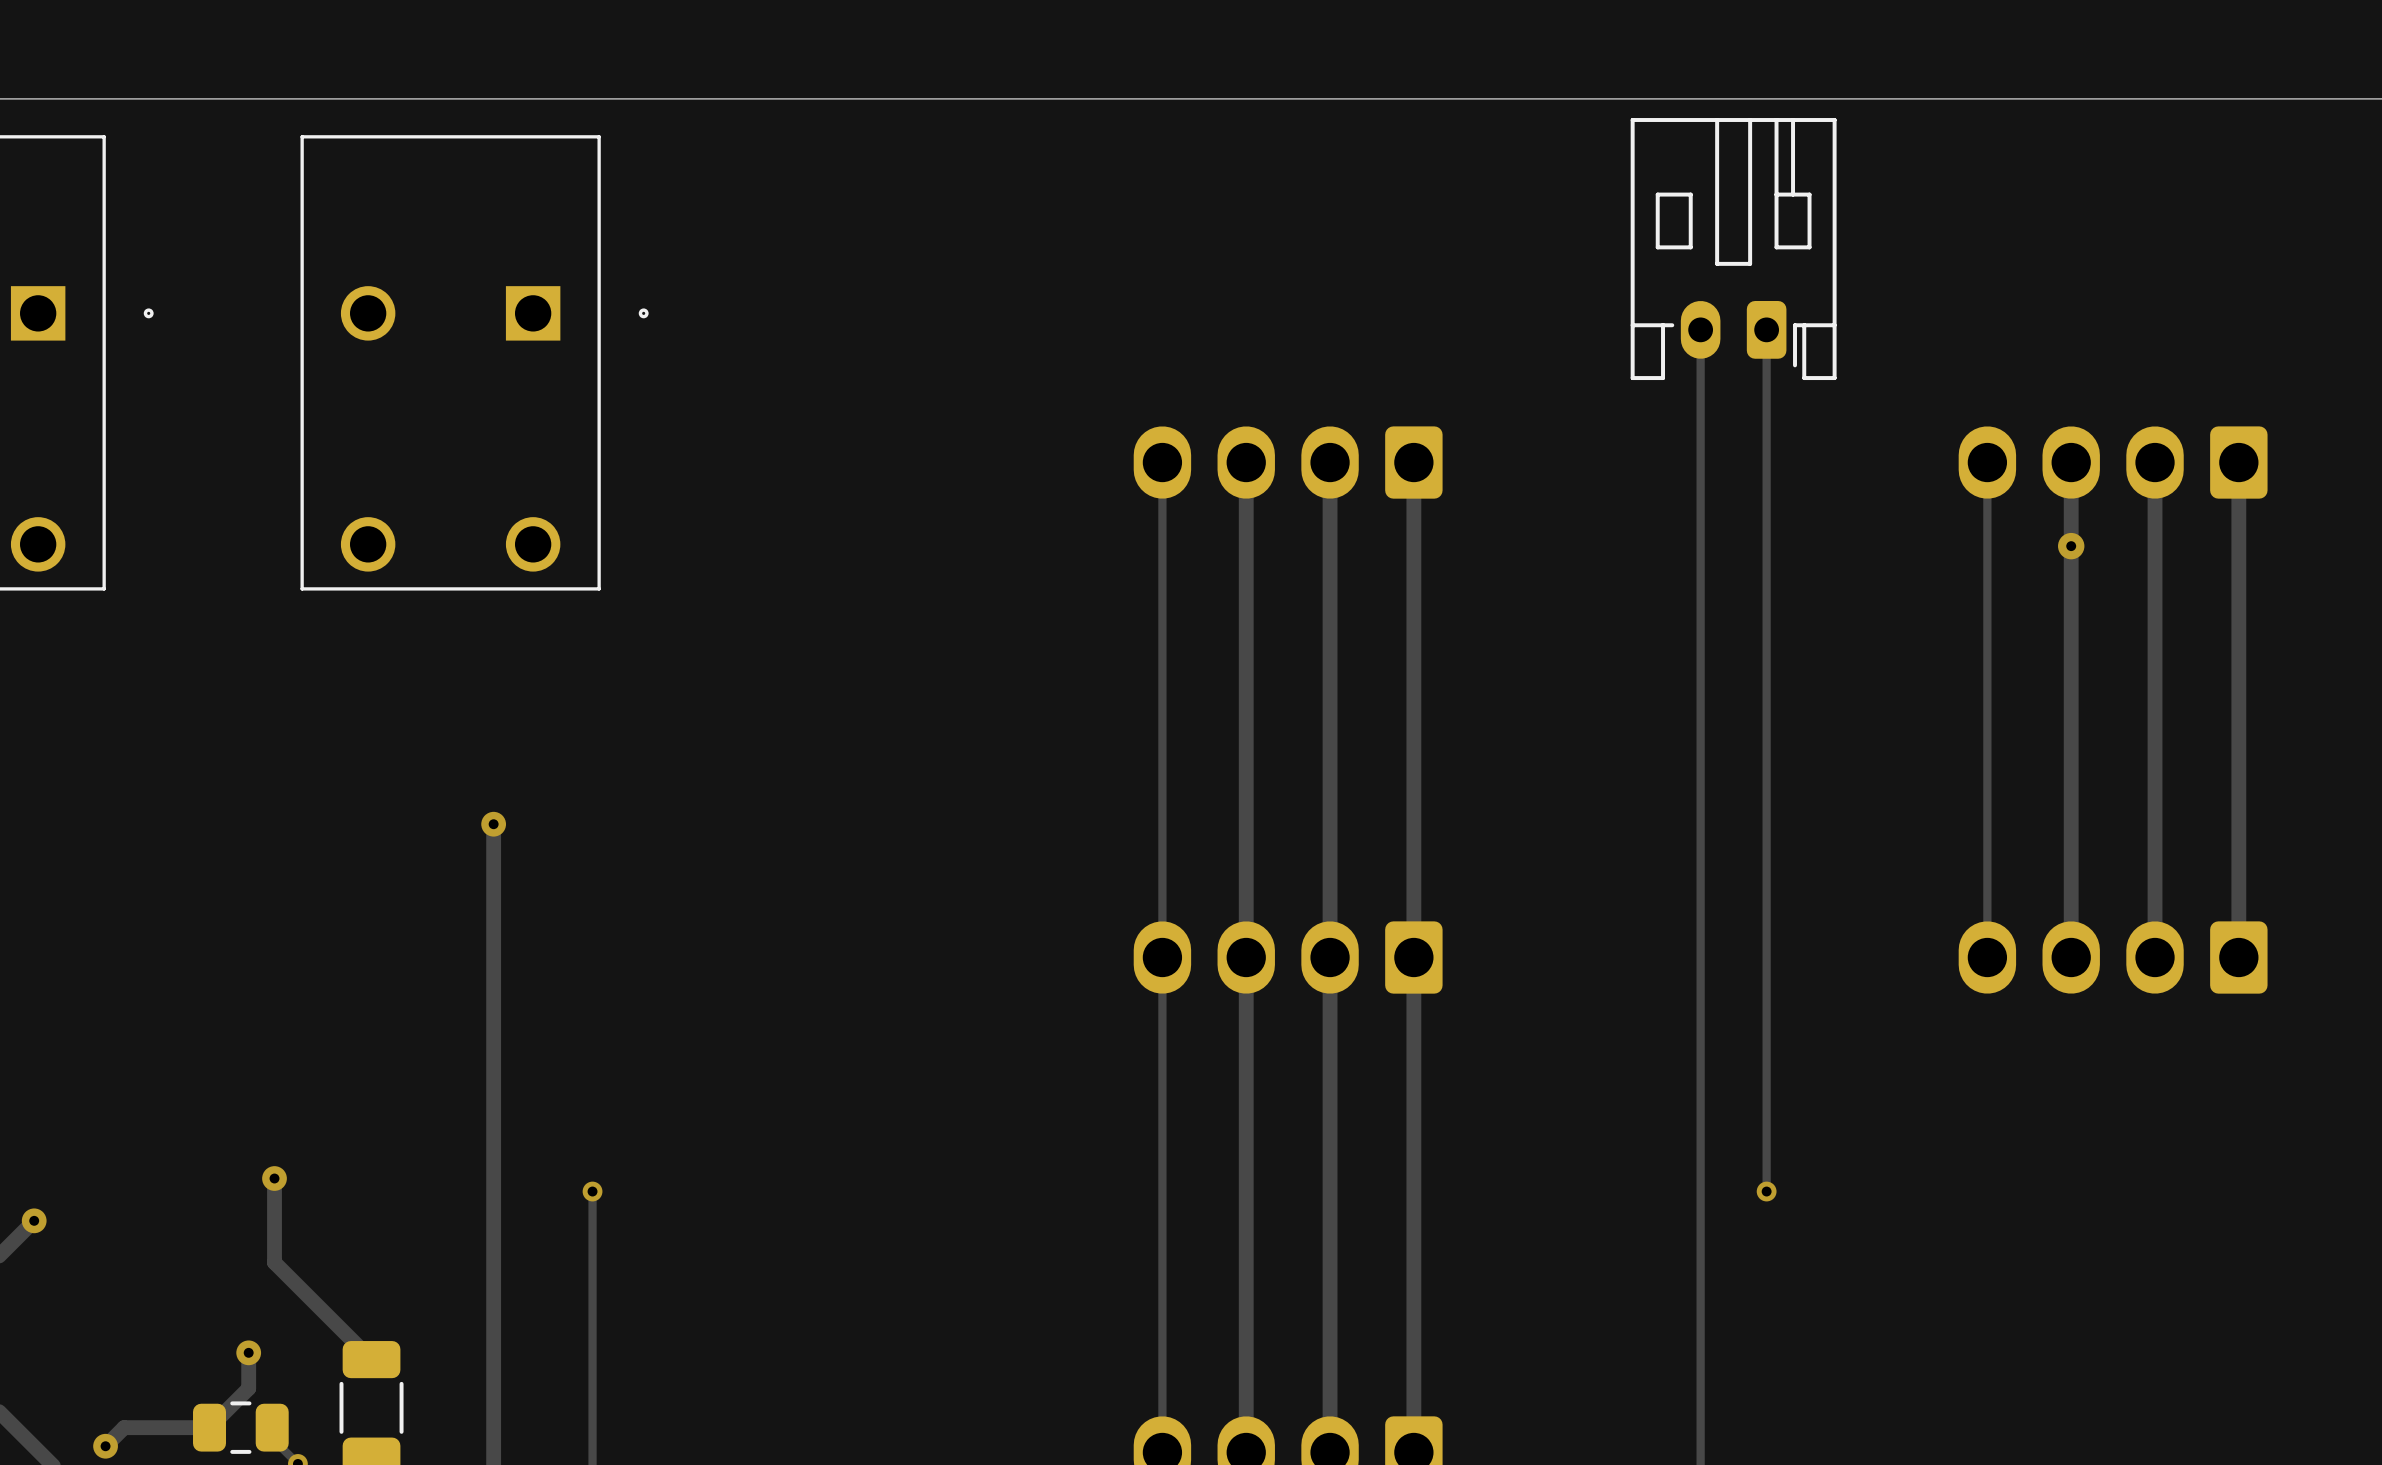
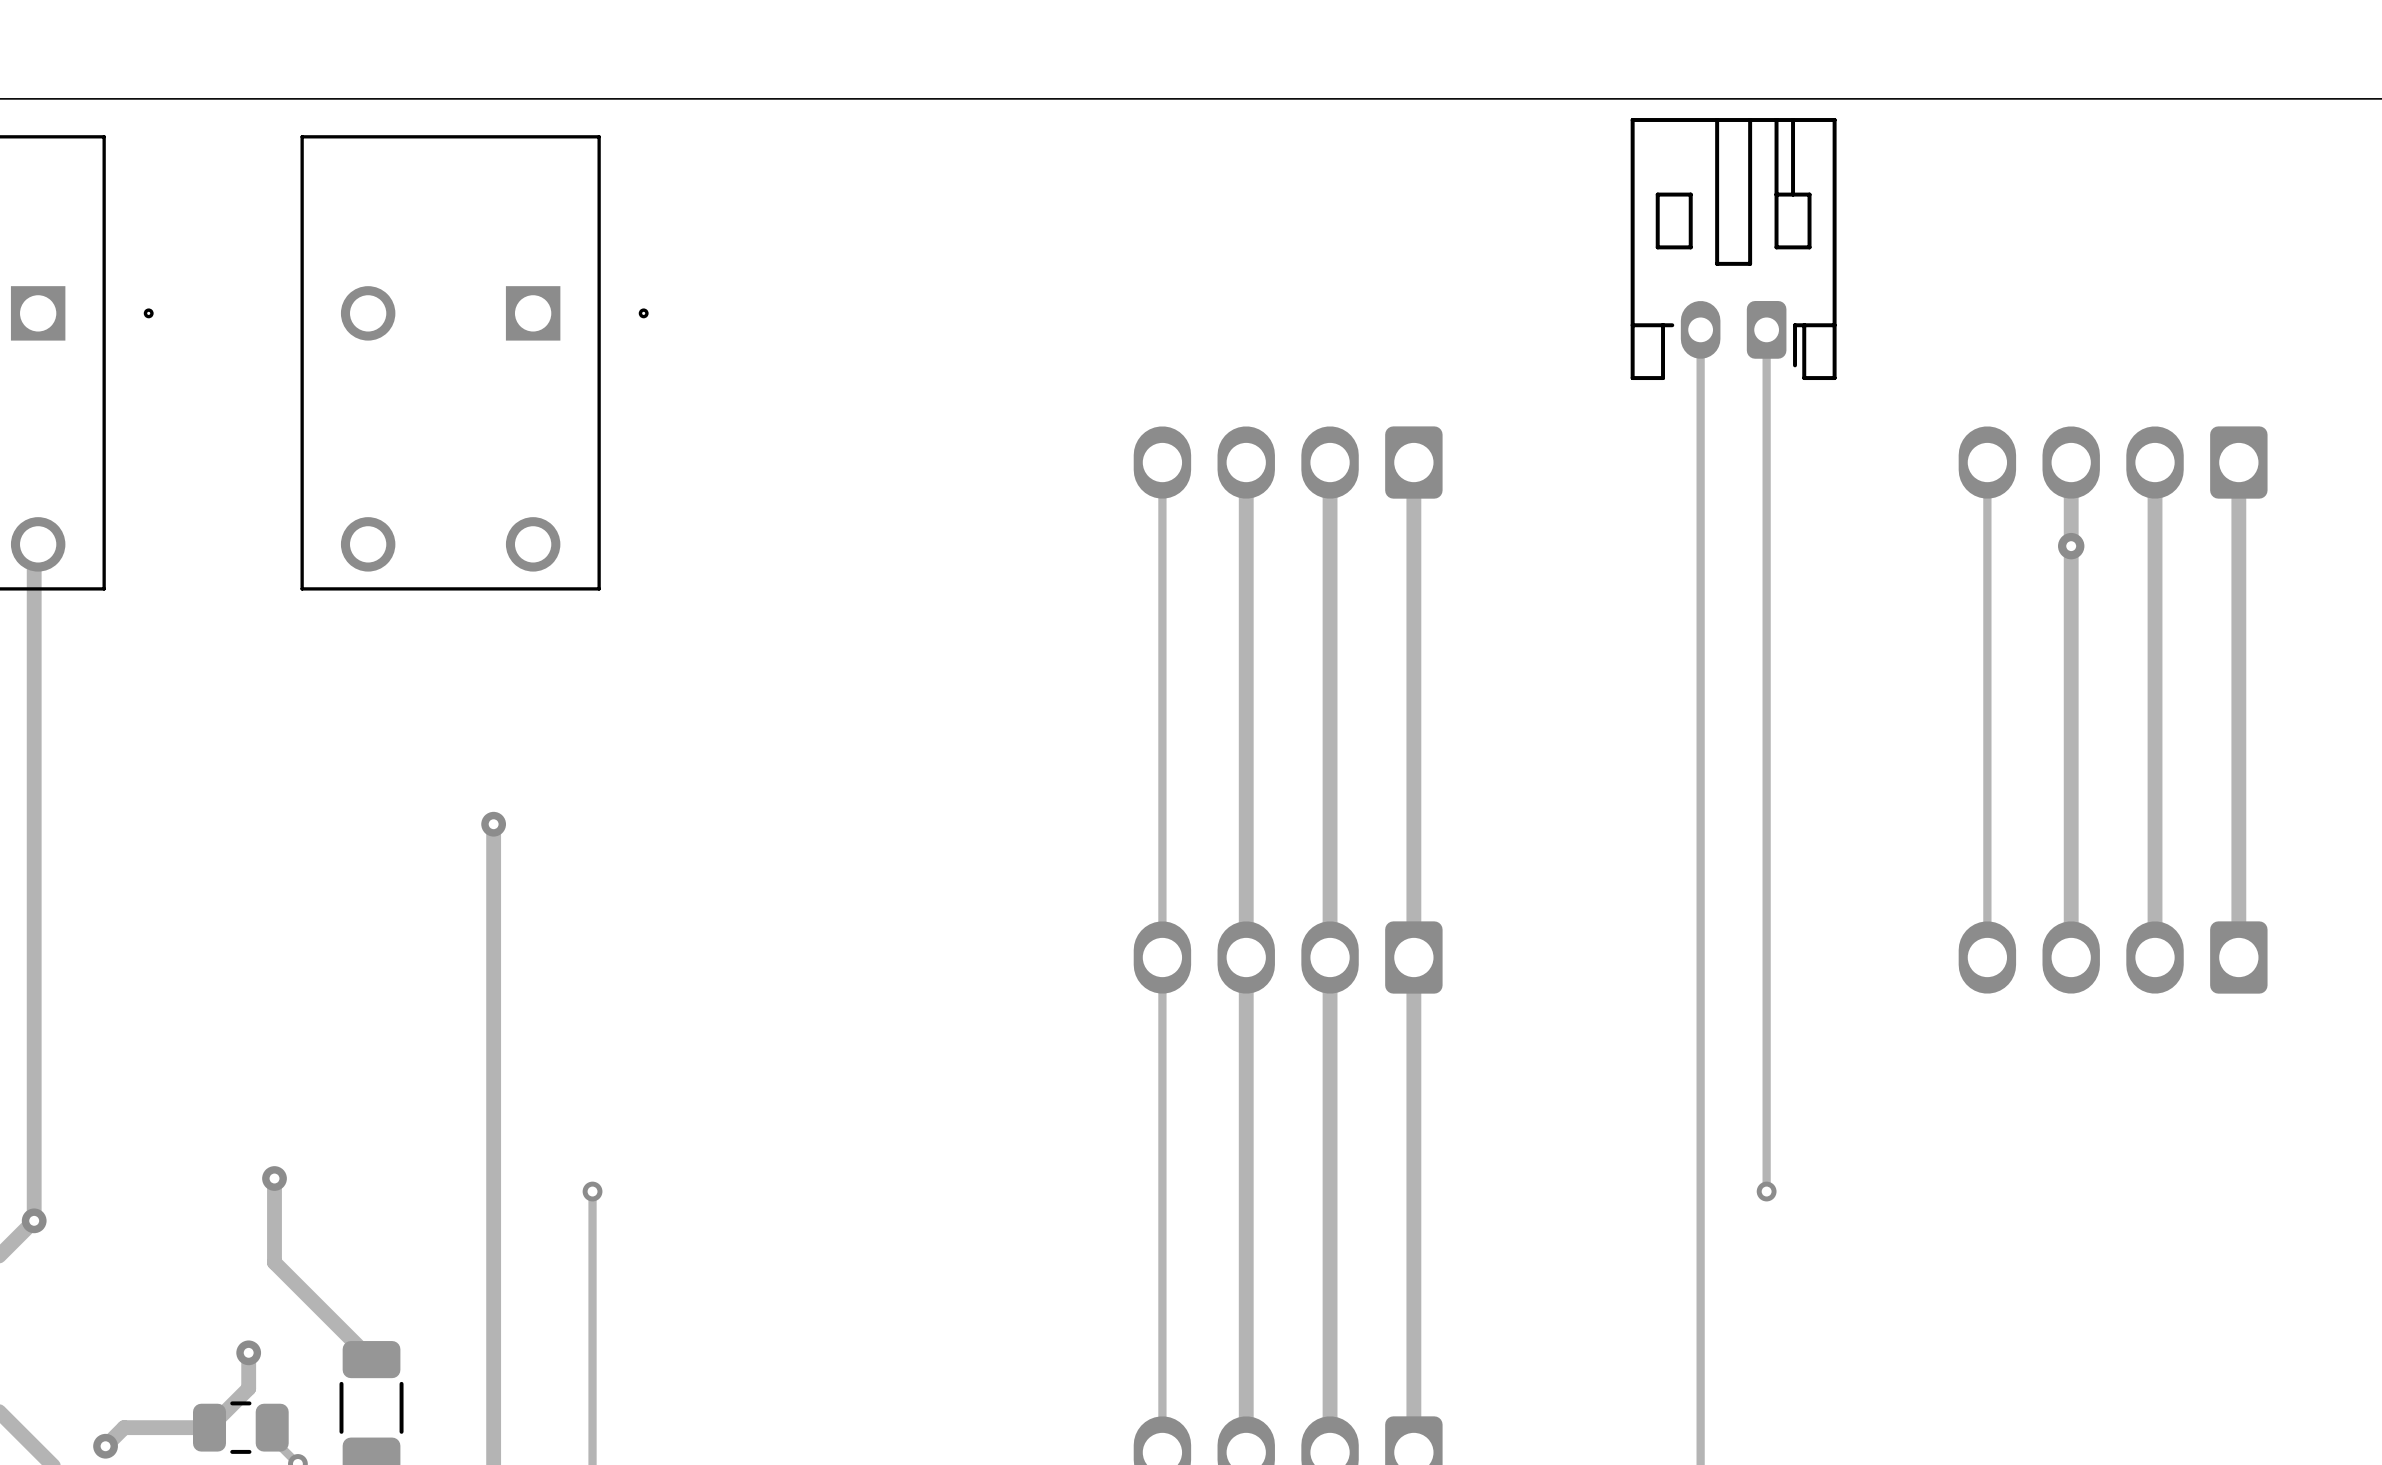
track: none -> (38, 544) (34, 548) (34, 1220)

